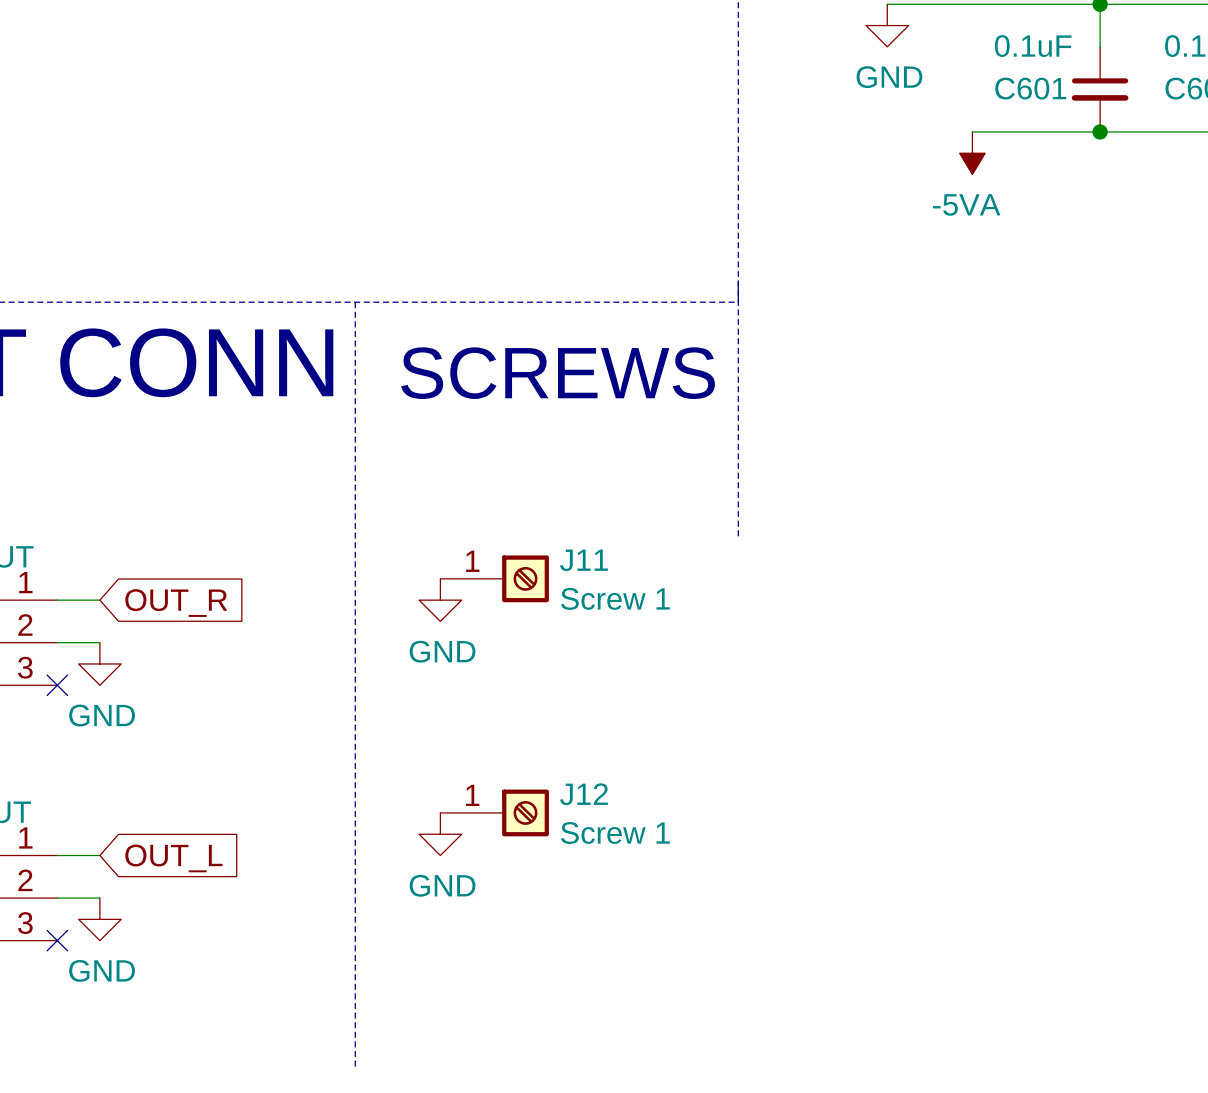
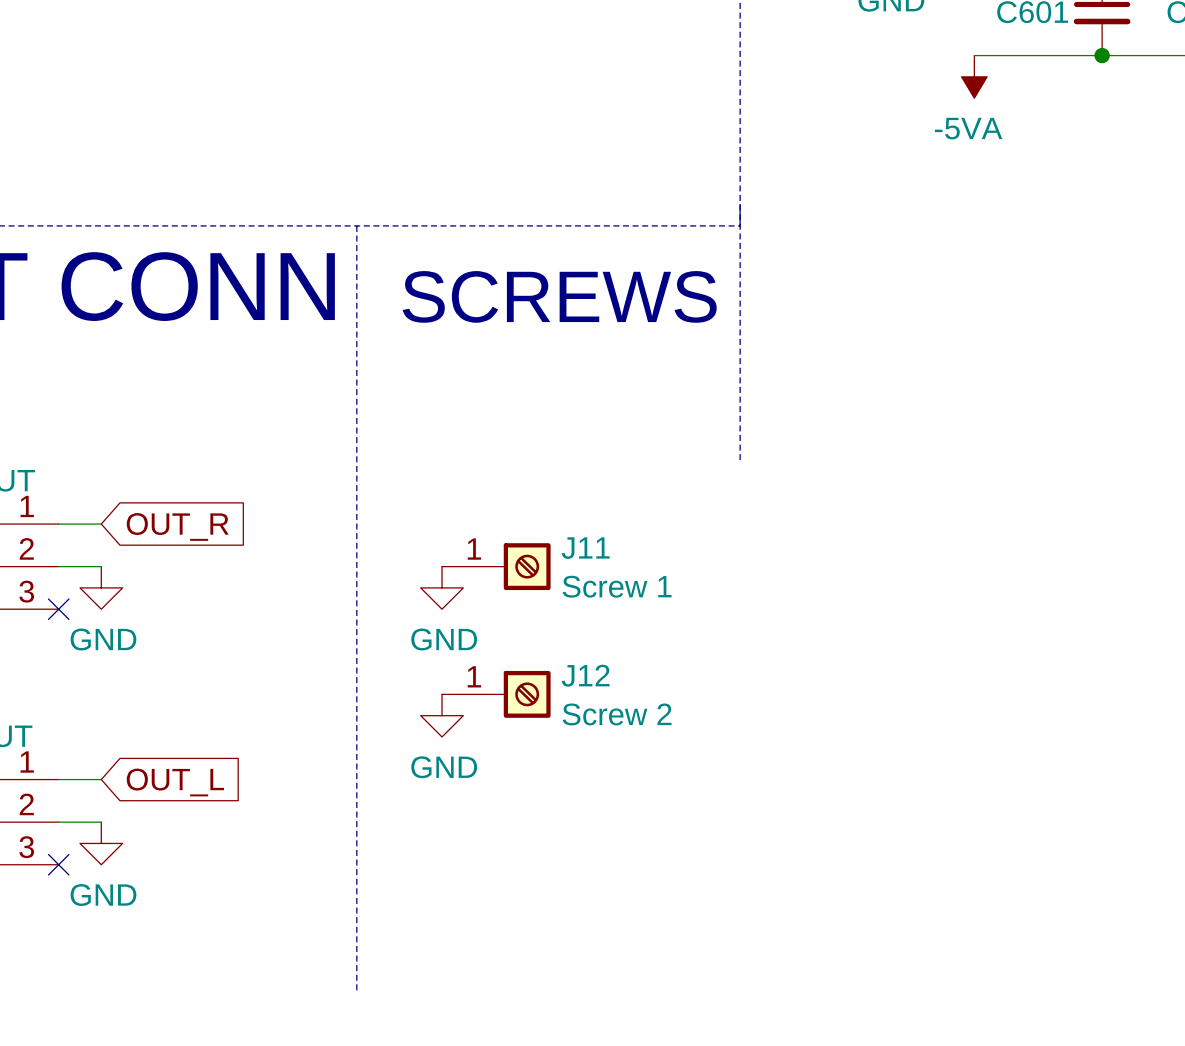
J11 position: (494, 578) -> (496, 566)
power symbol position: GND (440, 600) -> GND (442, 587)
J12 position: (494, 812) -> (496, 694)
J12 value: Screw 1 (615, 833) -> Screw 2 (617, 714)
power symbol position: GND (440, 834) -> GND (442, 715)

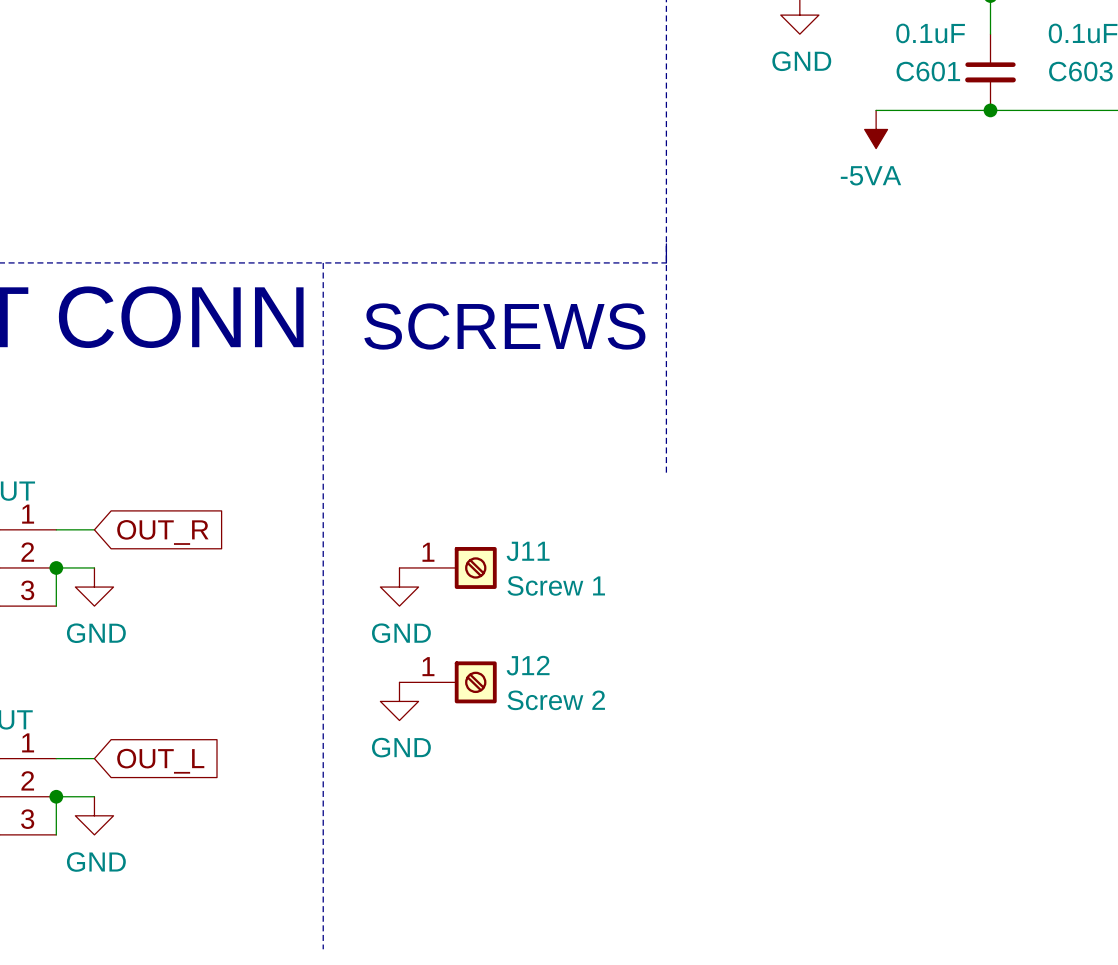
wire: none -> (56, 567) (56, 606)
junction: none -> (56, 567)
no-connect mark: (58, 609) -> none
wire: none -> (56, 796) (56, 834)
junction: none -> (56, 796)
no-connect mark: (58, 864) -> none

